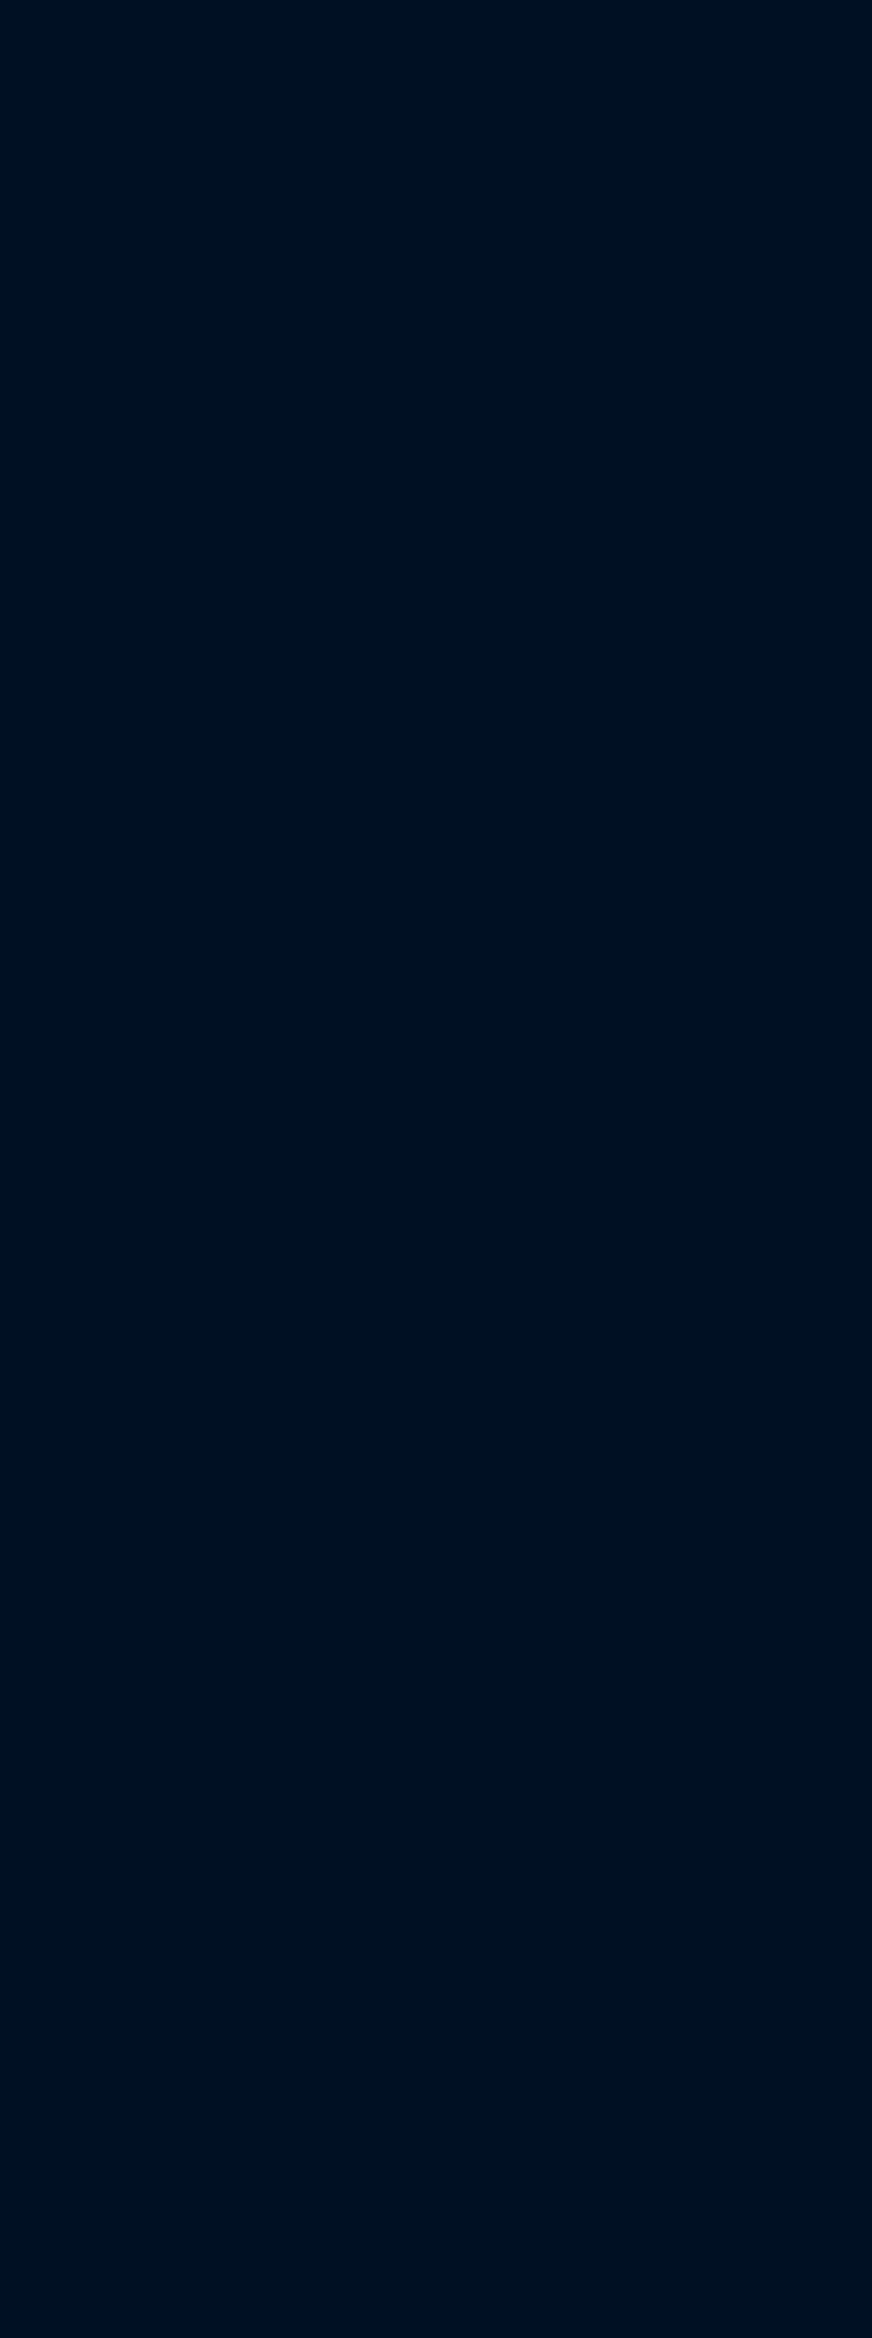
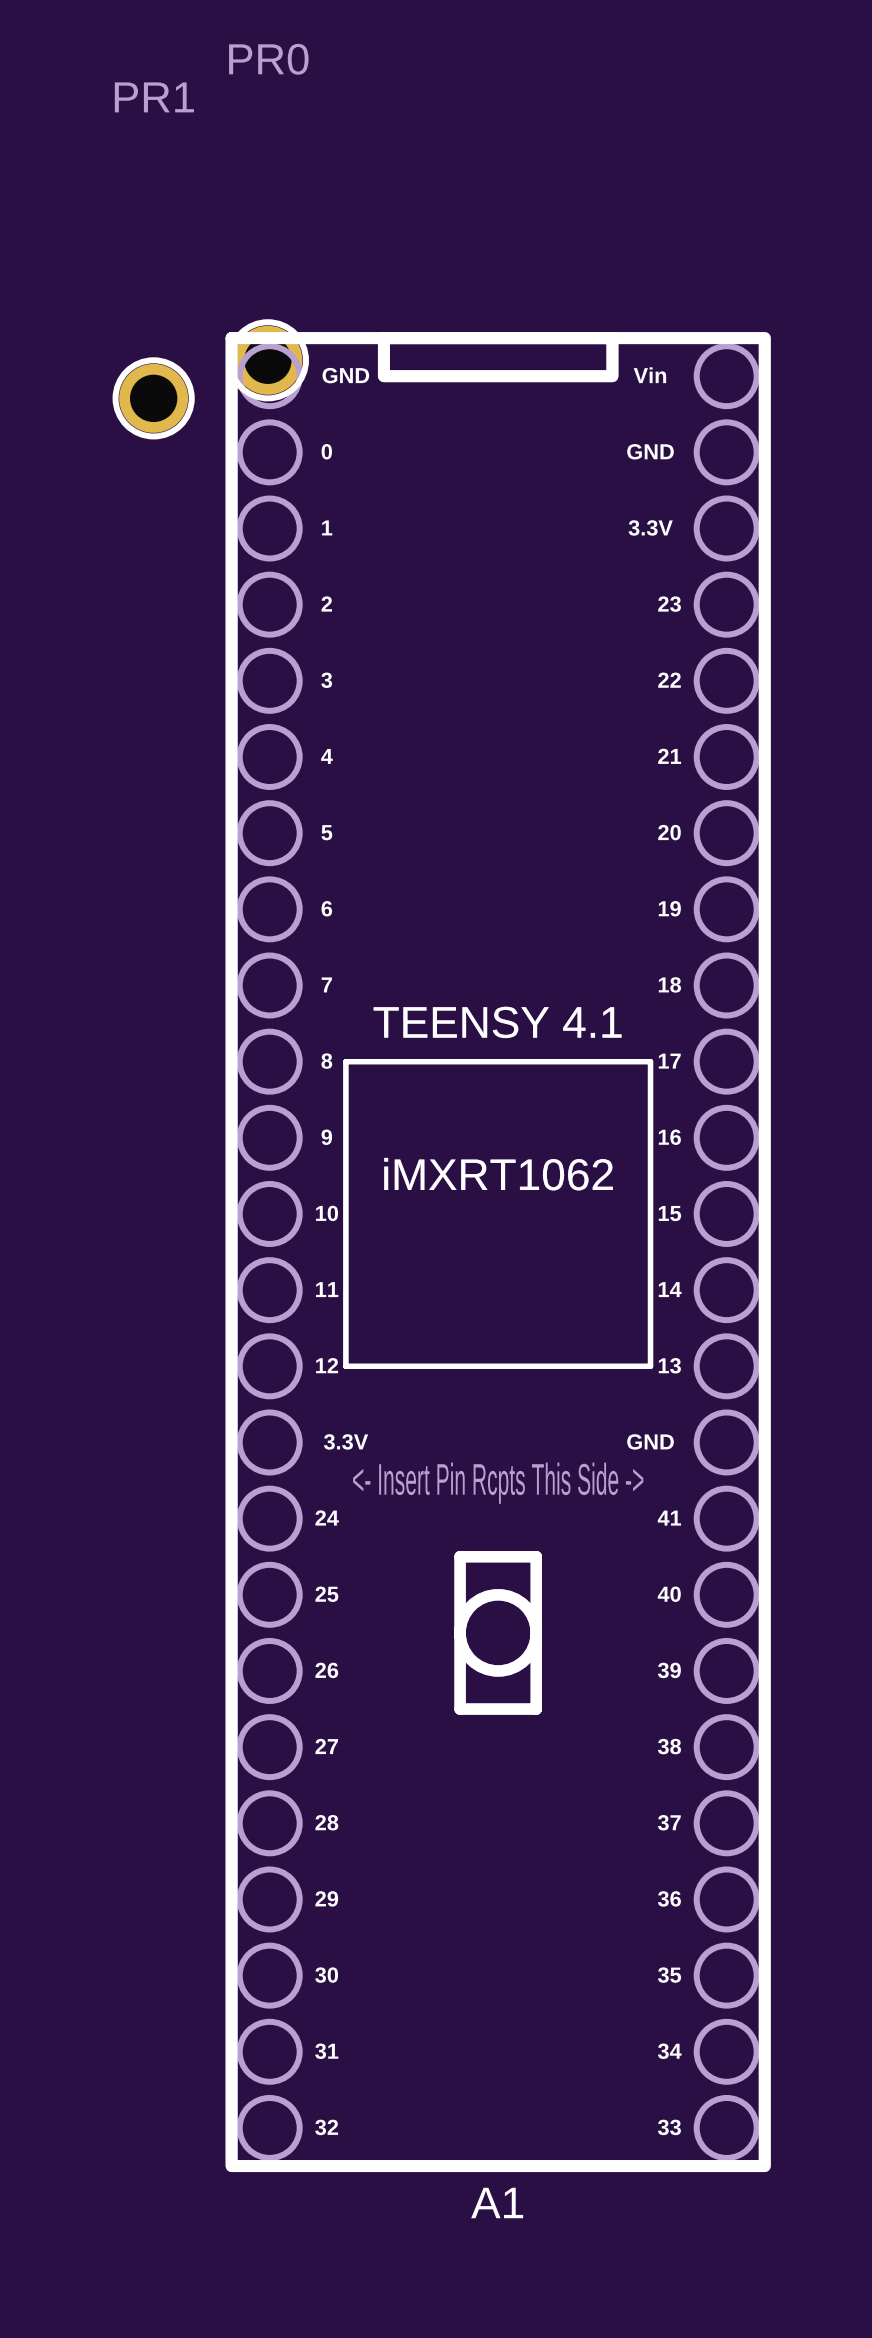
PR0: none -> (267, 360)
PR1: none -> (153, 398)
A1: none -> (498, 1252)

